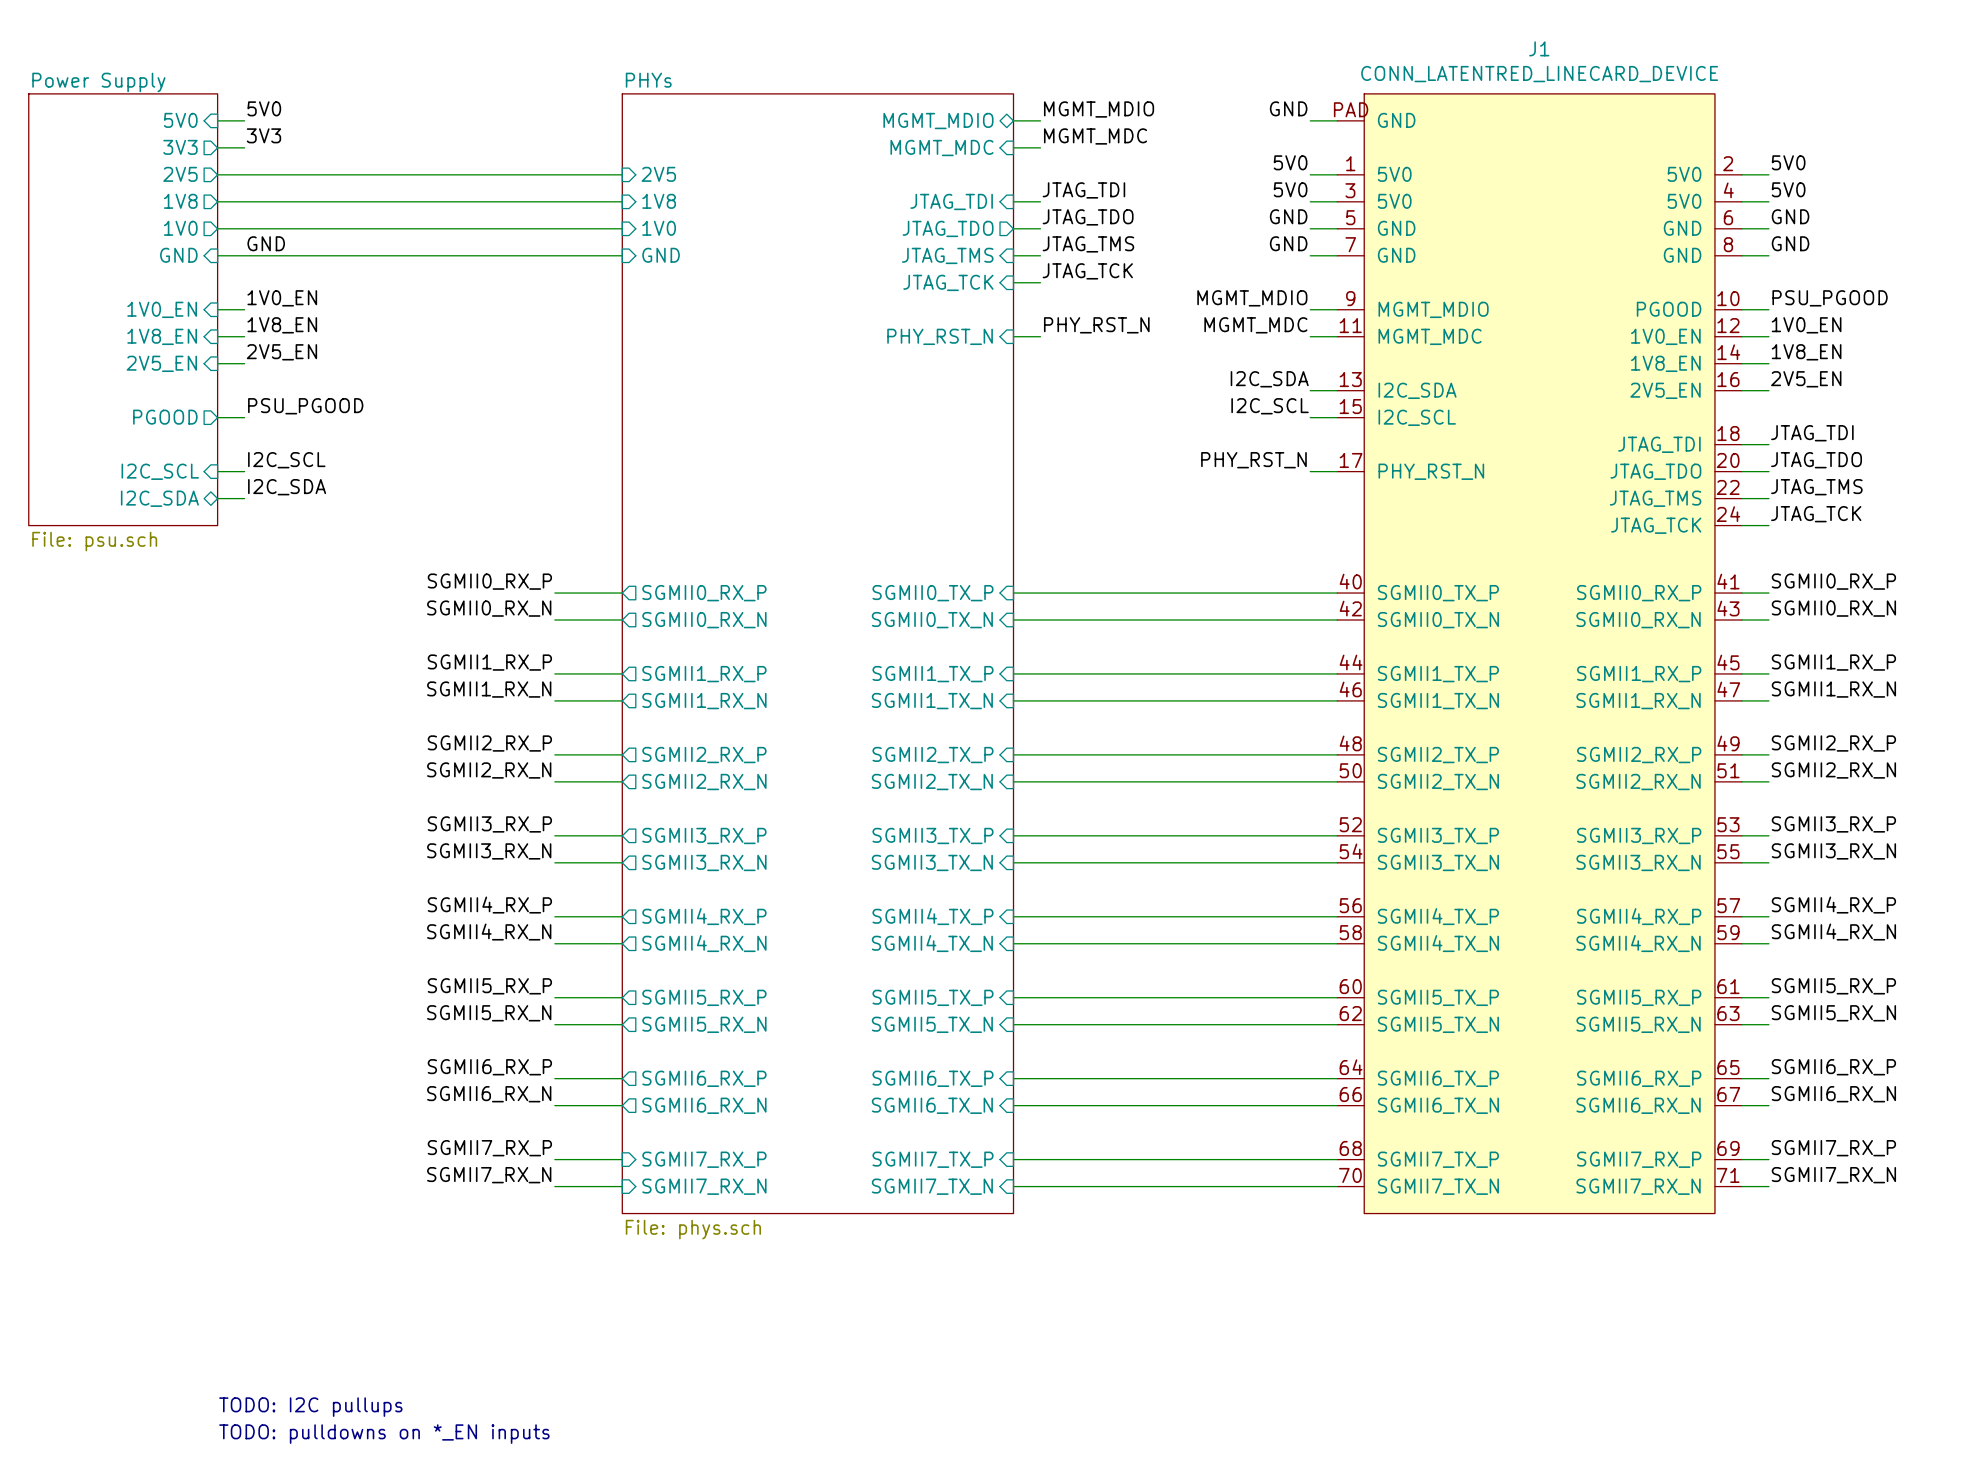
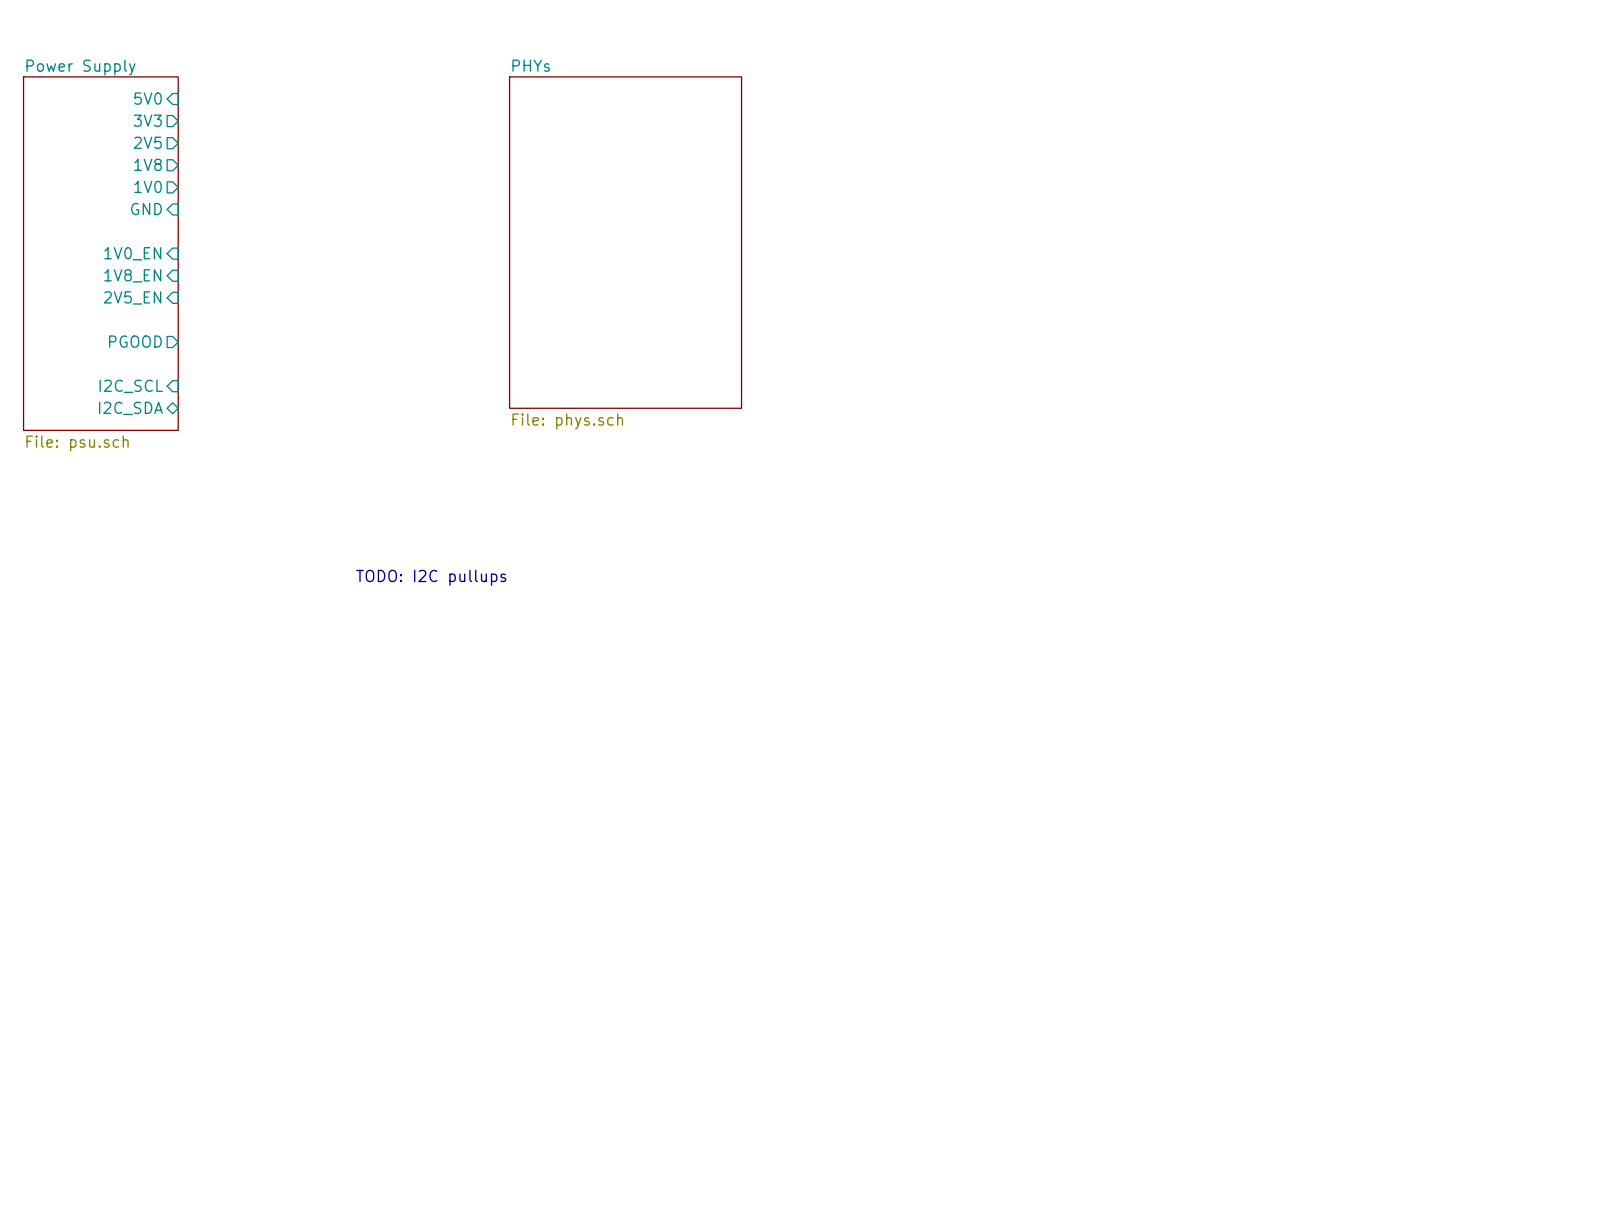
label: 5V0 (264, 108) -> none
label: GND (1288, 108) -> none
label: MGMT_MDIO (1099, 109) -> none
wire: (217, 120) (244, 120) -> none
wire: (1013, 120) (1040, 120) -> none
wire: (1310, 120) (1337, 120) -> none
sheet pin: MGMT_MDIO (938, 121) -> none
label: 3V3 (263, 135) -> none
label: MGMT_MDC (1095, 136) -> none
wire: (217, 147) (244, 147) -> none
wire: (1013, 147) (1040, 147) -> none
sheet pin: MGMT_MDC (941, 148) -> none
label: 5V0 (1290, 162) -> none
label: 5V0 (1788, 162) -> none
wire: (217, 174) (622, 174) -> none
sheet pin: 2V5 (658, 174) -> none
wire: (1310, 174) (1337, 174) -> none
wire: (1741, 174) (1768, 174) -> none
label: 5V0 (1290, 189) -> none
label: 5V0 (1788, 189) -> none
label: JTAG_TDI (1083, 190) -> none
wire: (217, 201) (622, 201) -> none
sheet pin: 1V8 (659, 201) -> none
sheet pin: JTAG_TDI (951, 201) -> none
wire: (1013, 201) (1040, 201) -> none
wire: (1310, 201) (1337, 201) -> none
wire: (1741, 201) (1768, 201) -> none
label: GND (1288, 216) -> none
label: GND (1790, 216) -> none
label: JTAG_TDO (1088, 217) -> none
wire: (217, 228) (622, 228) -> none
sheet pin: 1V0 (659, 228) -> none
sheet pin: JTAG_TDO (948, 228) -> none
wire: (1013, 228) (1040, 228) -> none
wire: (1310, 228) (1337, 228) -> none
wire: (1741, 228) (1768, 228) -> none
label: GND (266, 243) -> none
label: GND (1288, 243) -> none
label: GND (1790, 243) -> none
label: JTAG_TMS (1088, 244) -> none
wire: (217, 255) (622, 255) -> none
sheet pin: GND (661, 255) -> none
sheet pin: JTAG_TMS (947, 255) -> none
wire: (1013, 255) (1040, 255) -> none
wire: (1310, 255) (1337, 255) -> none
wire: (1741, 255) (1768, 255) -> none
label: JTAG_TCK (1087, 271) -> none
sheet pin: JTAG_TCK (948, 282) -> none
wire: (1013, 282) (1040, 282) -> none
sheet PHYs: none -> File: phys.sch (625, 242)
label: 1V0_EN (282, 298) -> none
label: MGMT_MDIO (1252, 298) -> none
label: PSU_PGOOD (1830, 298) -> none
wire: (217, 309) (244, 309) -> none
wire: (1310, 309) (1337, 309) -> none
wire: (1741, 309) (1768, 309) -> none
label: 1V8_EN (282, 325) -> none
label: PHY_RST_N (1096, 325) -> none
label: MGMT_MDC (1255, 325) -> none
label: 1V0_EN (1806, 325) -> none
wire: (217, 336) (244, 336) -> none
sheet pin: PHY_RST_N (940, 336) -> none
wire: (1013, 336) (1040, 336) -> none
wire: (1310, 336) (1337, 336) -> none
wire: (1741, 336) (1768, 336) -> none
label: 2V5_EN (281, 352) -> none
label: 1V8_EN (1806, 352) -> none
wire: (217, 363) (244, 363) -> none
wire: (1741, 363) (1768, 363) -> none
label: I2C_SDA (1269, 379) -> none
label: 2V5_EN (1806, 379) -> none
wire: (1310, 390) (1337, 390) -> none
wire: (1741, 390) (1768, 390) -> none
label: PSU_PGOOD (305, 406) -> none
label: I2C_SCL (1270, 406) -> none
wire: (217, 417) (244, 417) -> none
wire: (1310, 417) (1337, 417) -> none
label: JTAG_TDI (1812, 433) -> none
wire: (1741, 444) (1768, 444) -> none
label: I2C_SCL (286, 460) -> none
label: PHY_RST_N (1253, 460) -> none
label: JTAG_TDO (1816, 460) -> none
wire: (217, 471) (244, 471) -> none
wire: (1310, 471) (1337, 471) -> none
wire: (1741, 471) (1768, 471) -> none
label: I2C_SDA (287, 487) -> none
label: JTAG_TMS (1816, 487) -> none
wire: (217, 498) (244, 498) -> none
wire: (1741, 498) (1768, 498) -> none
label: JTAG_TCK (1816, 514) -> none
wire: (1741, 525) (1768, 525) -> none
label: SGMII0_RX_P (489, 581) -> none
label: SGMII0_RX_P (1833, 581) -> none
wire: (554, 593) (622, 593) -> none
sheet pin: SGMII0_RX_P (704, 593) -> none
sheet pin: SGMII0_TX_P (933, 593) -> none
wire: (1013, 593) (1337, 593) -> none
wire: (1741, 593) (1768, 593) -> none
label: SGMII0_RX_N (489, 608) -> none
label: SGMII0_RX_N (1833, 608) -> none
wire: (554, 620) (622, 620) -> none
sheet pin: SGMII0_RX_N (704, 620) -> none
sheet pin: SGMII0_TX_N (932, 620) -> none
wire: (1013, 620) (1337, 620) -> none
wire: (1741, 620) (1768, 620) -> none
sheet PHYs: File: phys.sch (817, 653) -> none
J1: CONN_LATENTRED_LINECARD_DEVICE (1539, 653) -> none
label: SGMII1_RX_P (489, 662) -> none
label: SGMII1_RX_P (1833, 662) -> none
wire: (554, 673) (622, 673) -> none
wire: (1013, 673) (1337, 673) -> none
wire: (1741, 673) (1768, 673) -> none
sheet pin: SGMII1_RX_P (704, 674) -> none
sheet pin: SGMII1_TX_P (933, 674) -> none
label: SGMII1_RX_N (489, 689) -> none
label: SGMII1_RX_N (1833, 689) -> none
wire: (554, 700) (622, 700) -> none
wire: (1013, 700) (1337, 700) -> none
wire: (1741, 700) (1768, 700) -> none
sheet pin: SGMII1_RX_N (704, 701) -> none
sheet pin: SGMII1_TX_N (932, 701) -> none
text: none -> TODO: I2C pullups (431, 577)
label: SGMII2_RX_P (489, 743) -> none
label: SGMII2_RX_P (1833, 743) -> none
wire: (554, 754) (622, 754) -> none
wire: (1013, 754) (1337, 754) -> none
wire: (1741, 754) (1768, 754) -> none
sheet pin: SGMII2_RX_P (704, 755) -> none
sheet pin: SGMII2_TX_P (933, 755) -> none
label: SGMII2_RX_N (489, 770) -> none
label: SGMII2_RX_N (1833, 770) -> none
wire: (554, 781) (622, 781) -> none
wire: (1013, 781) (1337, 781) -> none
wire: (1741, 781) (1768, 781) -> none
sheet pin: SGMII2_RX_N (704, 782) -> none
sheet pin: SGMII2_TX_N (932, 782) -> none
label: SGMII3_RX_P (489, 824) -> none
label: SGMII3_RX_P (1833, 824) -> none
wire: (554, 835) (622, 835) -> none
sheet pin: SGMII3_RX_P (704, 835) -> none
sheet pin: SGMII3_TX_P (933, 835) -> none
wire: (1013, 835) (1337, 835) -> none
wire: (1741, 835) (1768, 835) -> none
label: SGMII3_RX_N (489, 851) -> none
label: SGMII3_RX_N (1833, 851) -> none
wire: (554, 862) (622, 862) -> none
sheet pin: SGMII3_RX_N (704, 862) -> none
sheet pin: SGMII3_TX_N (932, 862) -> none
wire: (1013, 862) (1337, 862) -> none
wire: (1741, 862) (1768, 862) -> none
label: SGMII4_RX_P (489, 905) -> none
label: SGMII4_RX_P (1833, 905) -> none
wire: (554, 916) (622, 916) -> none
sheet pin: SGMII4_RX_P (704, 916) -> none
sheet pin: SGMII4_TX_P (933, 916) -> none
wire: (1013, 916) (1337, 916) -> none
wire: (1741, 916) (1768, 916) -> none
label: SGMII4_RX_N (489, 932) -> none
label: SGMII4_RX_N (1833, 932) -> none
wire: (554, 943) (622, 943) -> none
sheet pin: SGMII4_RX_N (704, 943) -> none
sheet pin: SGMII4_TX_N (932, 943) -> none
wire: (1013, 943) (1337, 943) -> none
wire: (1741, 943) (1768, 943) -> none
label: SGMII5_RX_P (489, 986) -> none
label: SGMII5_RX_P (1833, 986) -> none
wire: (554, 997) (622, 997) -> none
sheet pin: SGMII5_RX_P (704, 997) -> none
sheet pin: SGMII5_TX_P (933, 997) -> none
wire: (1013, 997) (1337, 997) -> none
wire: (1741, 997) (1768, 997) -> none
label: SGMII5_RX_N (489, 1013) -> none
label: SGMII5_RX_N (1833, 1013) -> none
wire: (554, 1024) (622, 1024) -> none
sheet pin: SGMII5_RX_N (704, 1024) -> none
sheet pin: SGMII5_TX_N (932, 1024) -> none
wire: (1013, 1024) (1337, 1024) -> none
wire: (1741, 1024) (1768, 1024) -> none
label: SGMII6_RX_P (489, 1067) -> none
label: SGMII6_RX_P (1833, 1067) -> none
wire: (554, 1078) (622, 1078) -> none
sheet pin: SGMII6_RX_P (704, 1078) -> none
sheet pin: SGMII6_TX_P (933, 1078) -> none
wire: (1013, 1078) (1337, 1078) -> none
wire: (1741, 1078) (1768, 1078) -> none
label: SGMII6_RX_N (489, 1094) -> none
label: SGMII6_RX_N (1833, 1094) -> none
wire: (554, 1105) (622, 1105) -> none
sheet pin: SGMII6_RX_N (704, 1105) -> none
sheet pin: SGMII6_TX_N (932, 1105) -> none
wire: (1013, 1105) (1337, 1105) -> none
wire: (1741, 1105) (1768, 1105) -> none
label: SGMII7_RX_P (489, 1148) -> none
label: SGMII7_RX_P (1833, 1148) -> none
wire: (554, 1159) (622, 1159) -> none
sheet pin: SGMII7_RX_P (704, 1159) -> none
sheet pin: SGMII7_TX_P (933, 1159) -> none
wire: (1013, 1159) (1337, 1159) -> none
wire: (1741, 1159) (1768, 1159) -> none
label: SGMII7_RX_N (489, 1175) -> none
label: SGMII7_RX_N (1833, 1175) -> none
wire: (554, 1186) (622, 1186) -> none
sheet pin: SGMII7_RX_N (704, 1186) -> none
sheet pin: SGMII7_TX_N (932, 1186) -> none
wire: (1013, 1186) (1337, 1186) -> none
wire: (1741, 1186) (1768, 1186) -> none
text: TODO: I2C pullups (310, 1407) -> none
text: TODO: pulldowns on *_EN inputs (384, 1434) -> none

